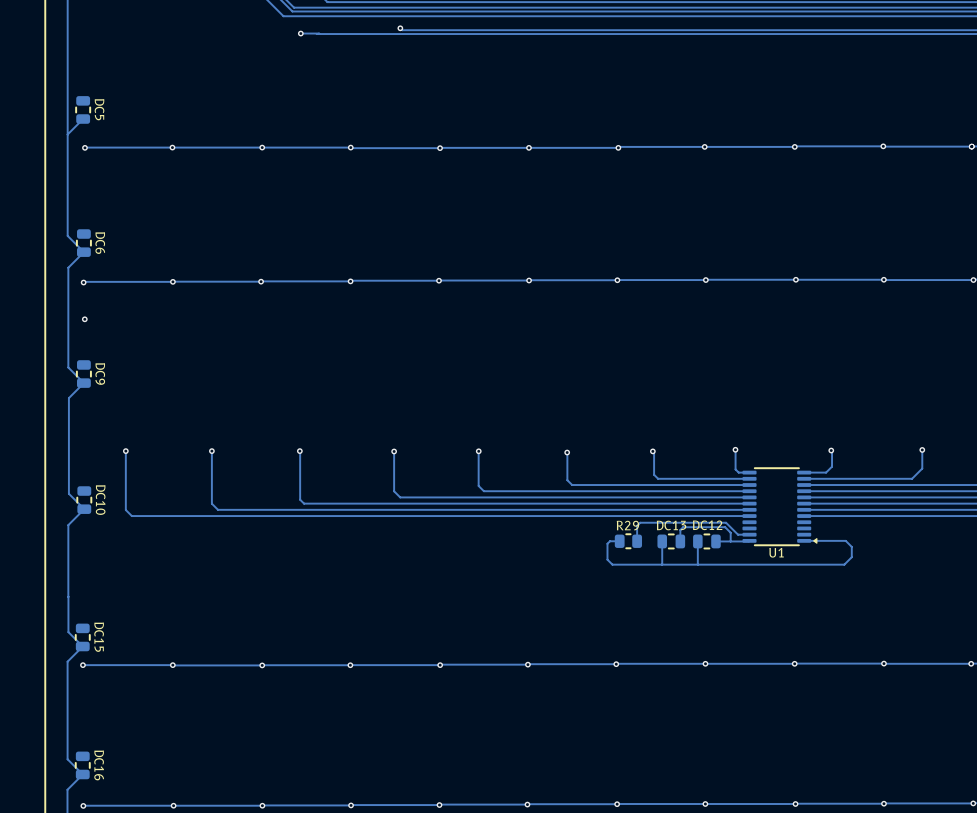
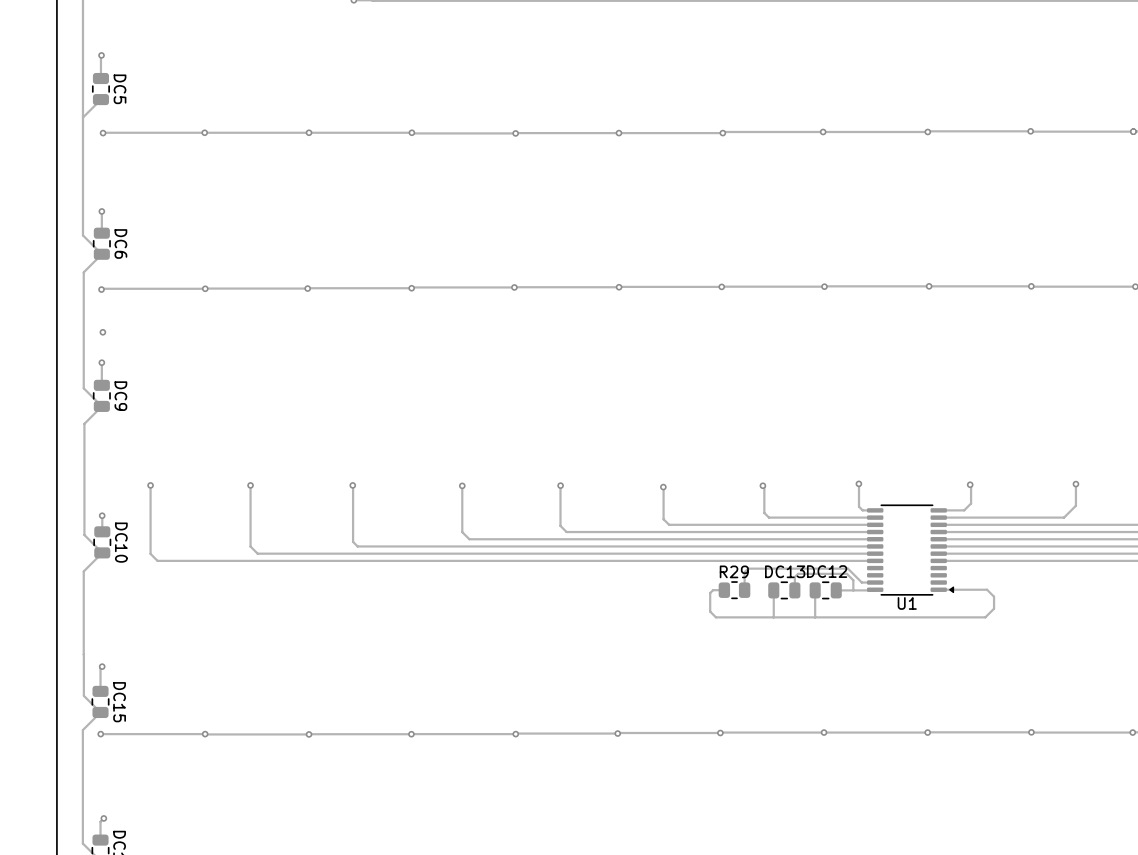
track: none -> (101, 55) (100, 78)
via: none -> (101, 55)
track: none -> (101, 211) (101, 233)
via: none -> (101, 211)
track: none -> (101, 362) (101, 385)
via: none -> (101, 362)
track: none -> (102, 515) (102, 531)
via: none -> (102, 515)
track: none -> (102, 666) (100, 668) (100, 691)
via: none -> (102, 666)
track: none -> (103, 818) (100, 821) (100, 840)
via: none -> (103, 818)

